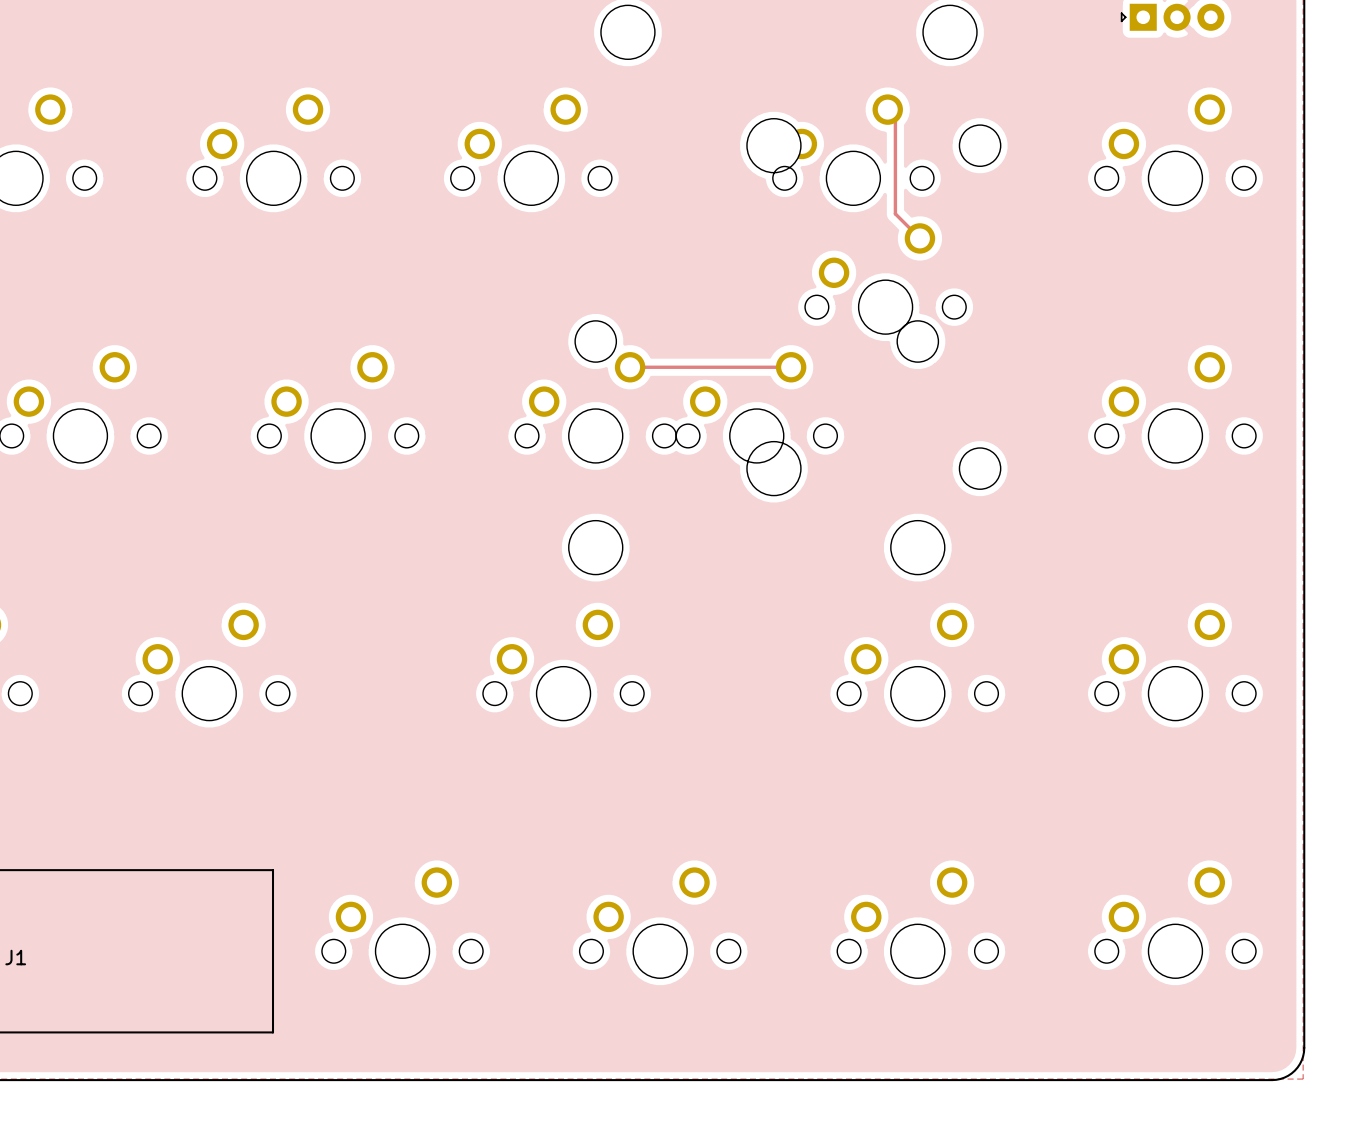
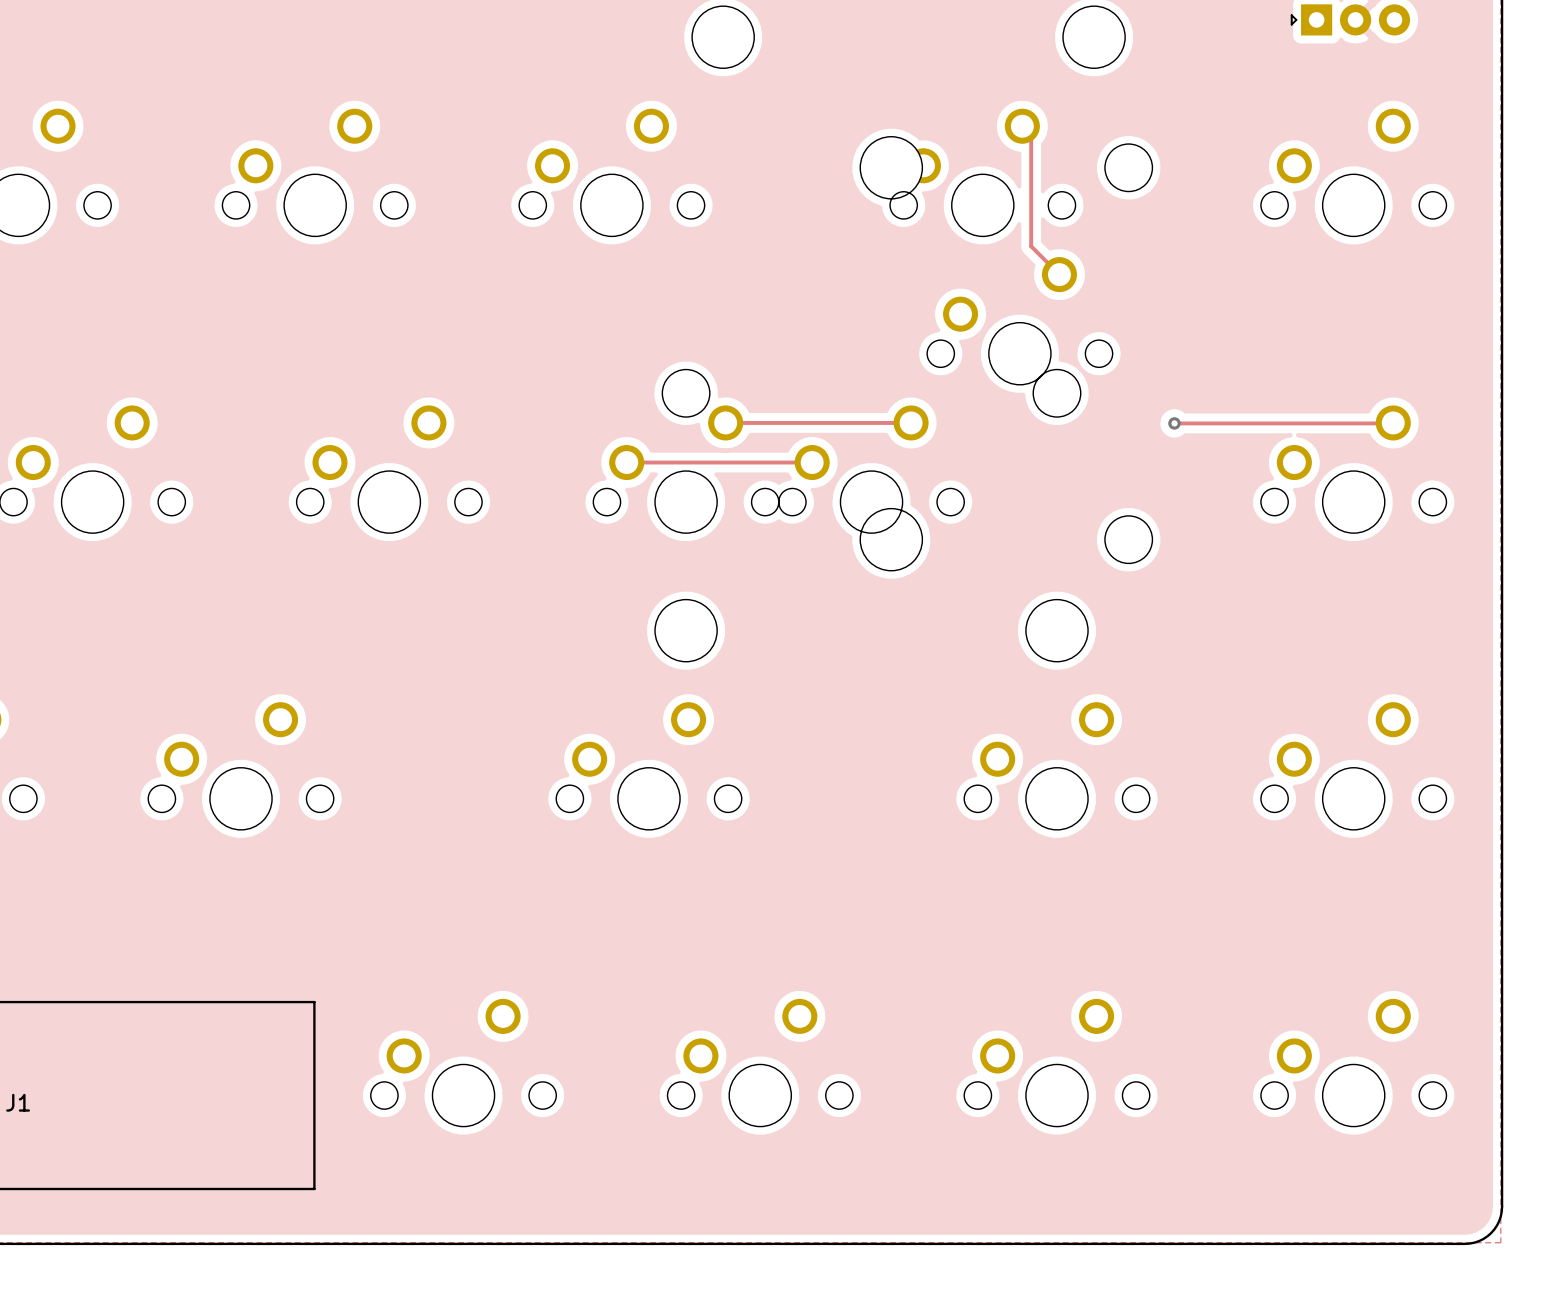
via: none -> (1174, 423)
track: none -> (1393, 422) (1174, 423)
track: none -> (626, 462) (812, 462)

